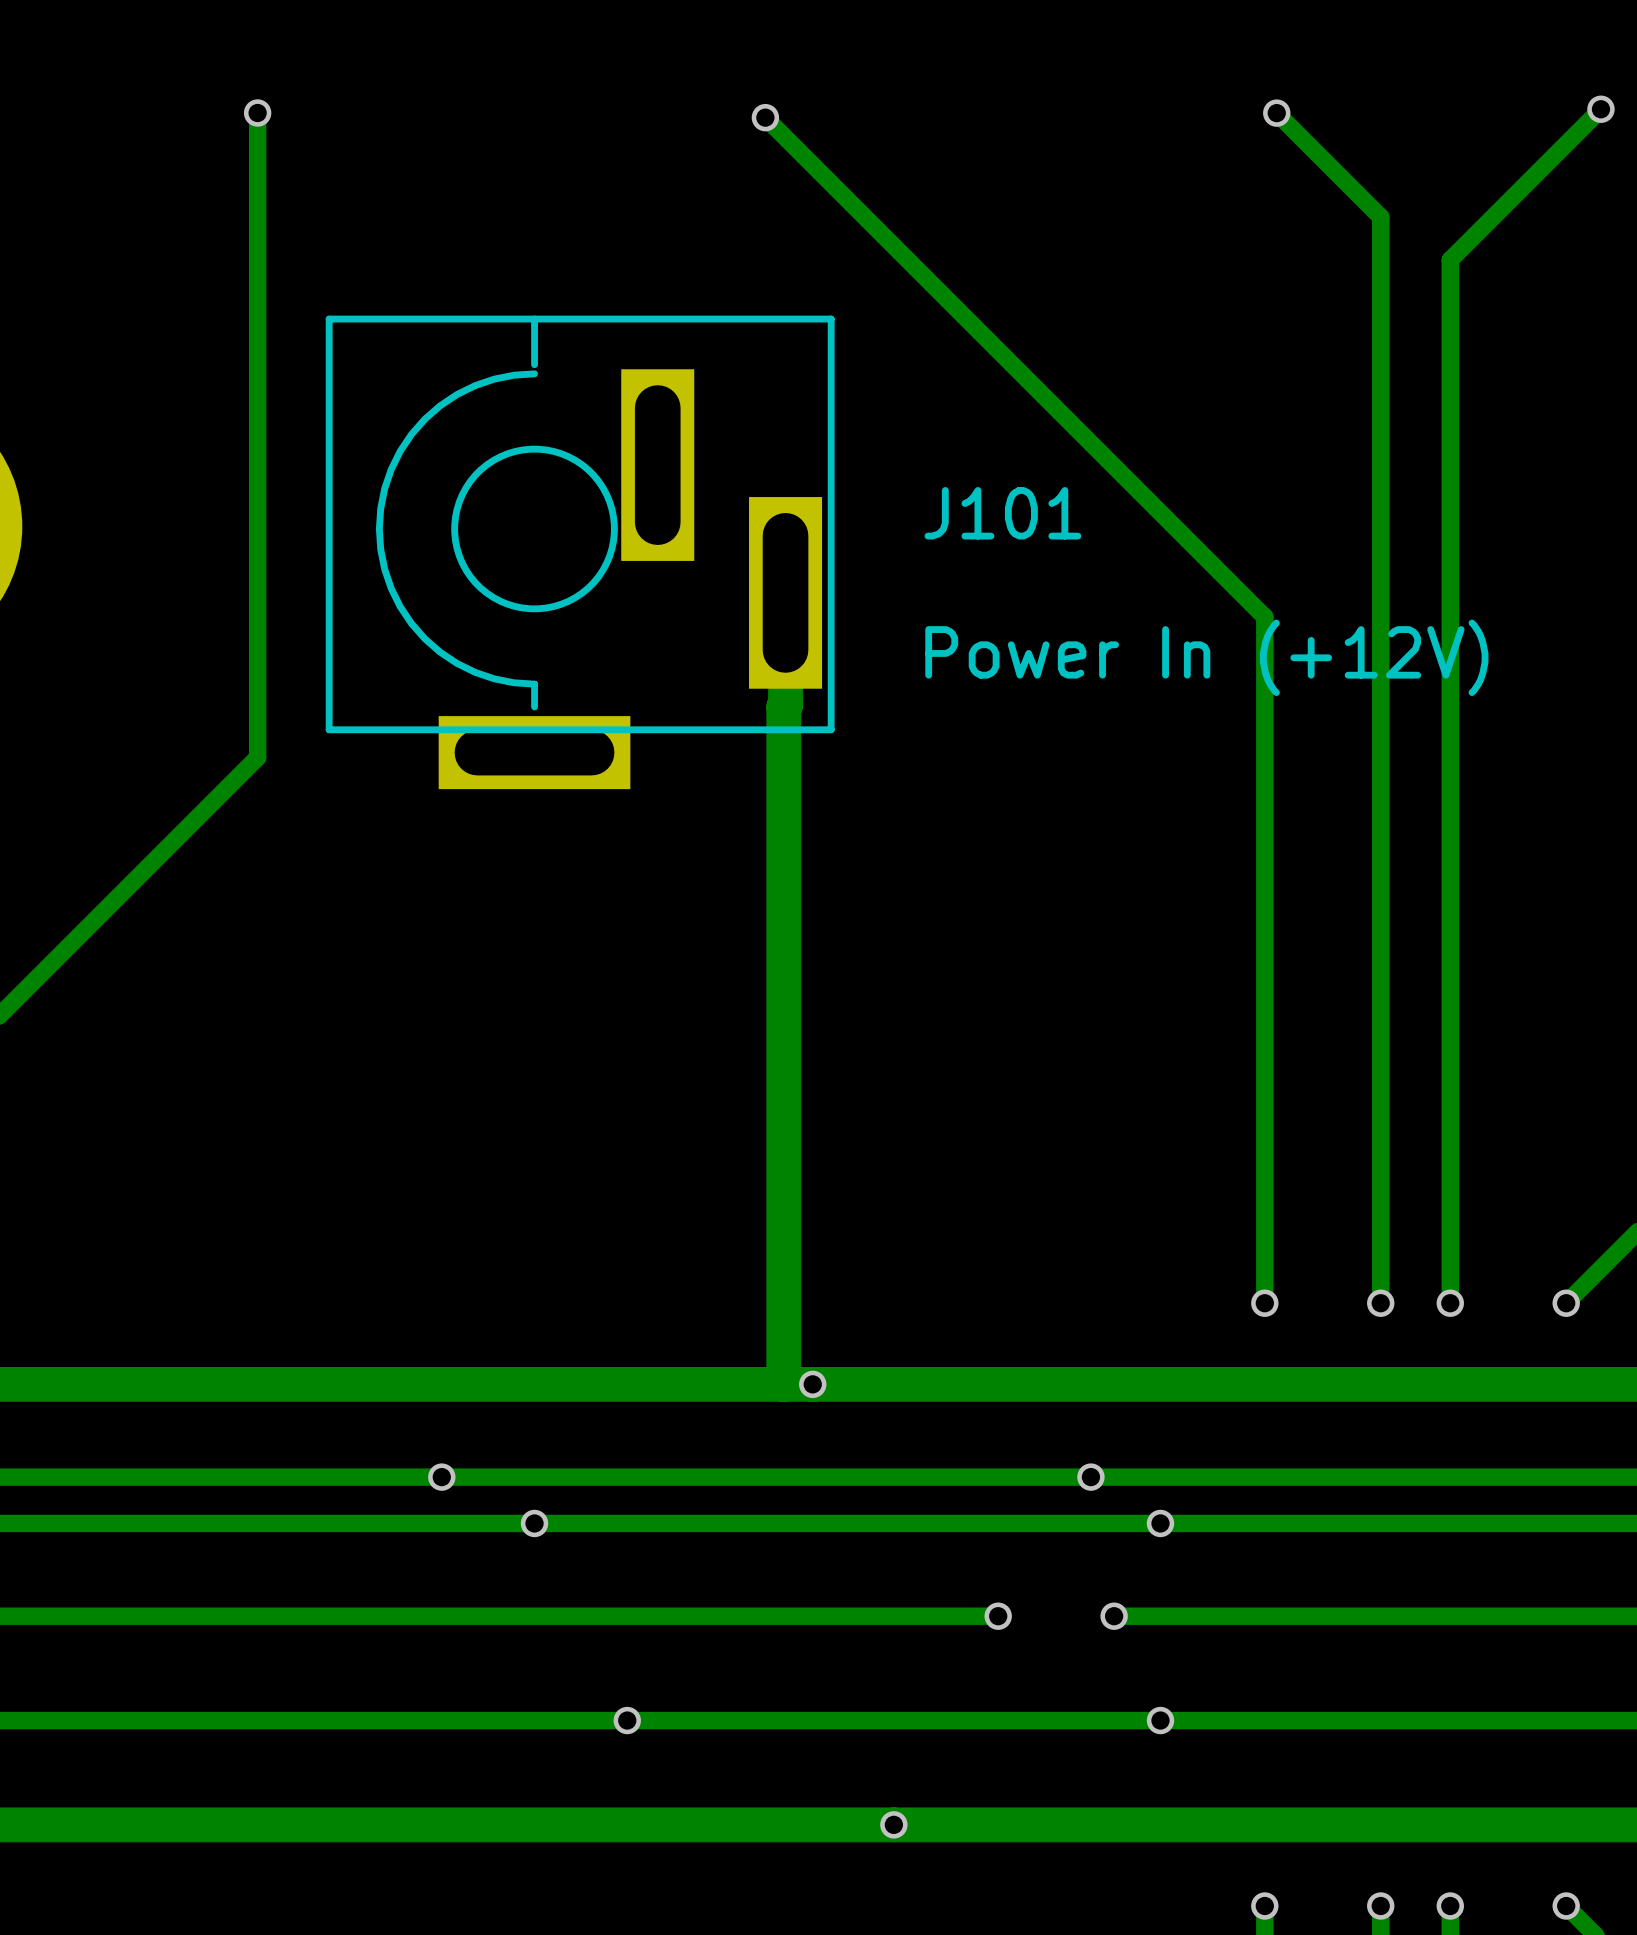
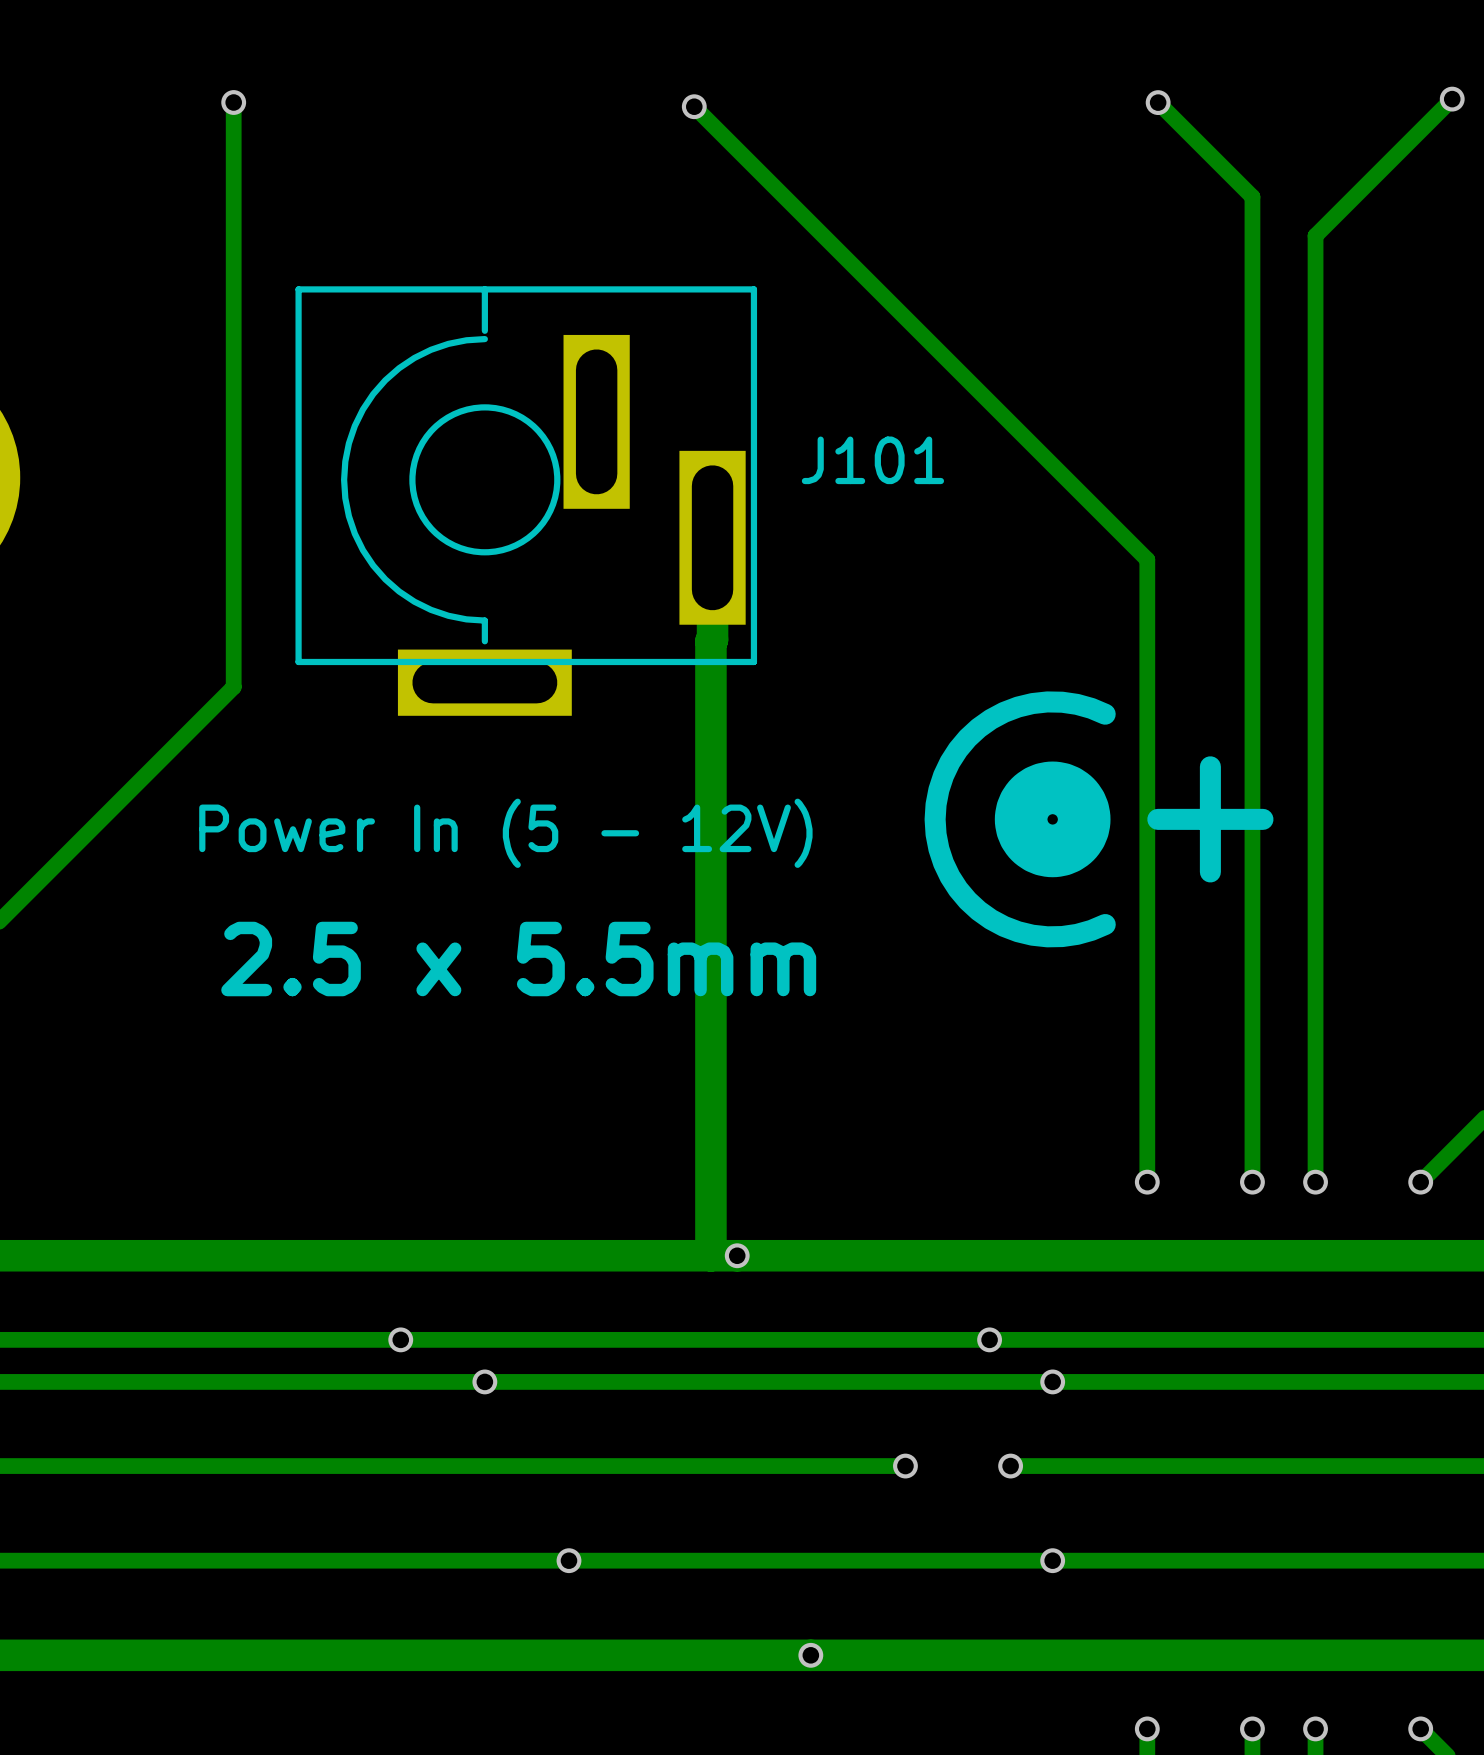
J101 name position: J101 (1002, 513) -> J101 (872, 460)
J101 value: Power In (+12V) (1206, 657) -> Power In (5 - 12V) (505, 833)
drawing: none -> [924, 691, 1274, 948]
text: none -> 2.5 x 5.5mm (518, 959)

